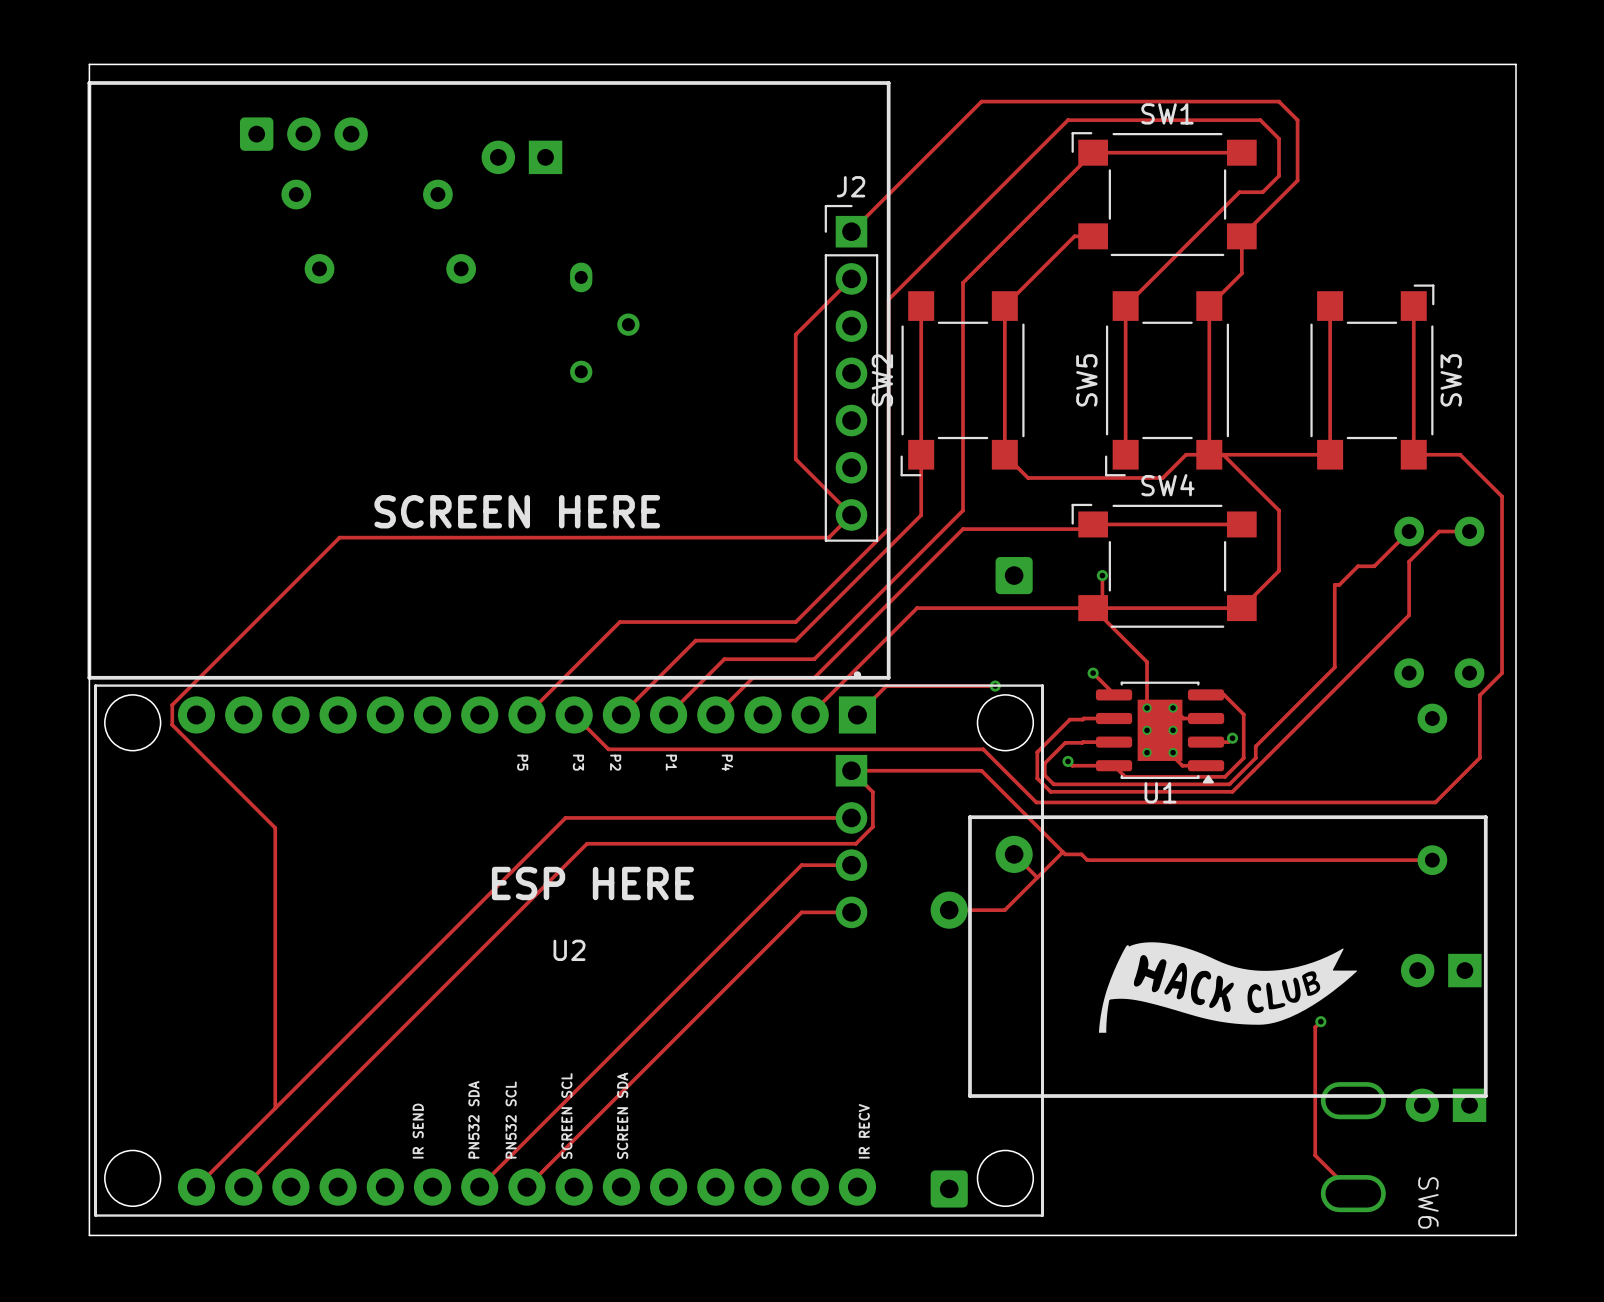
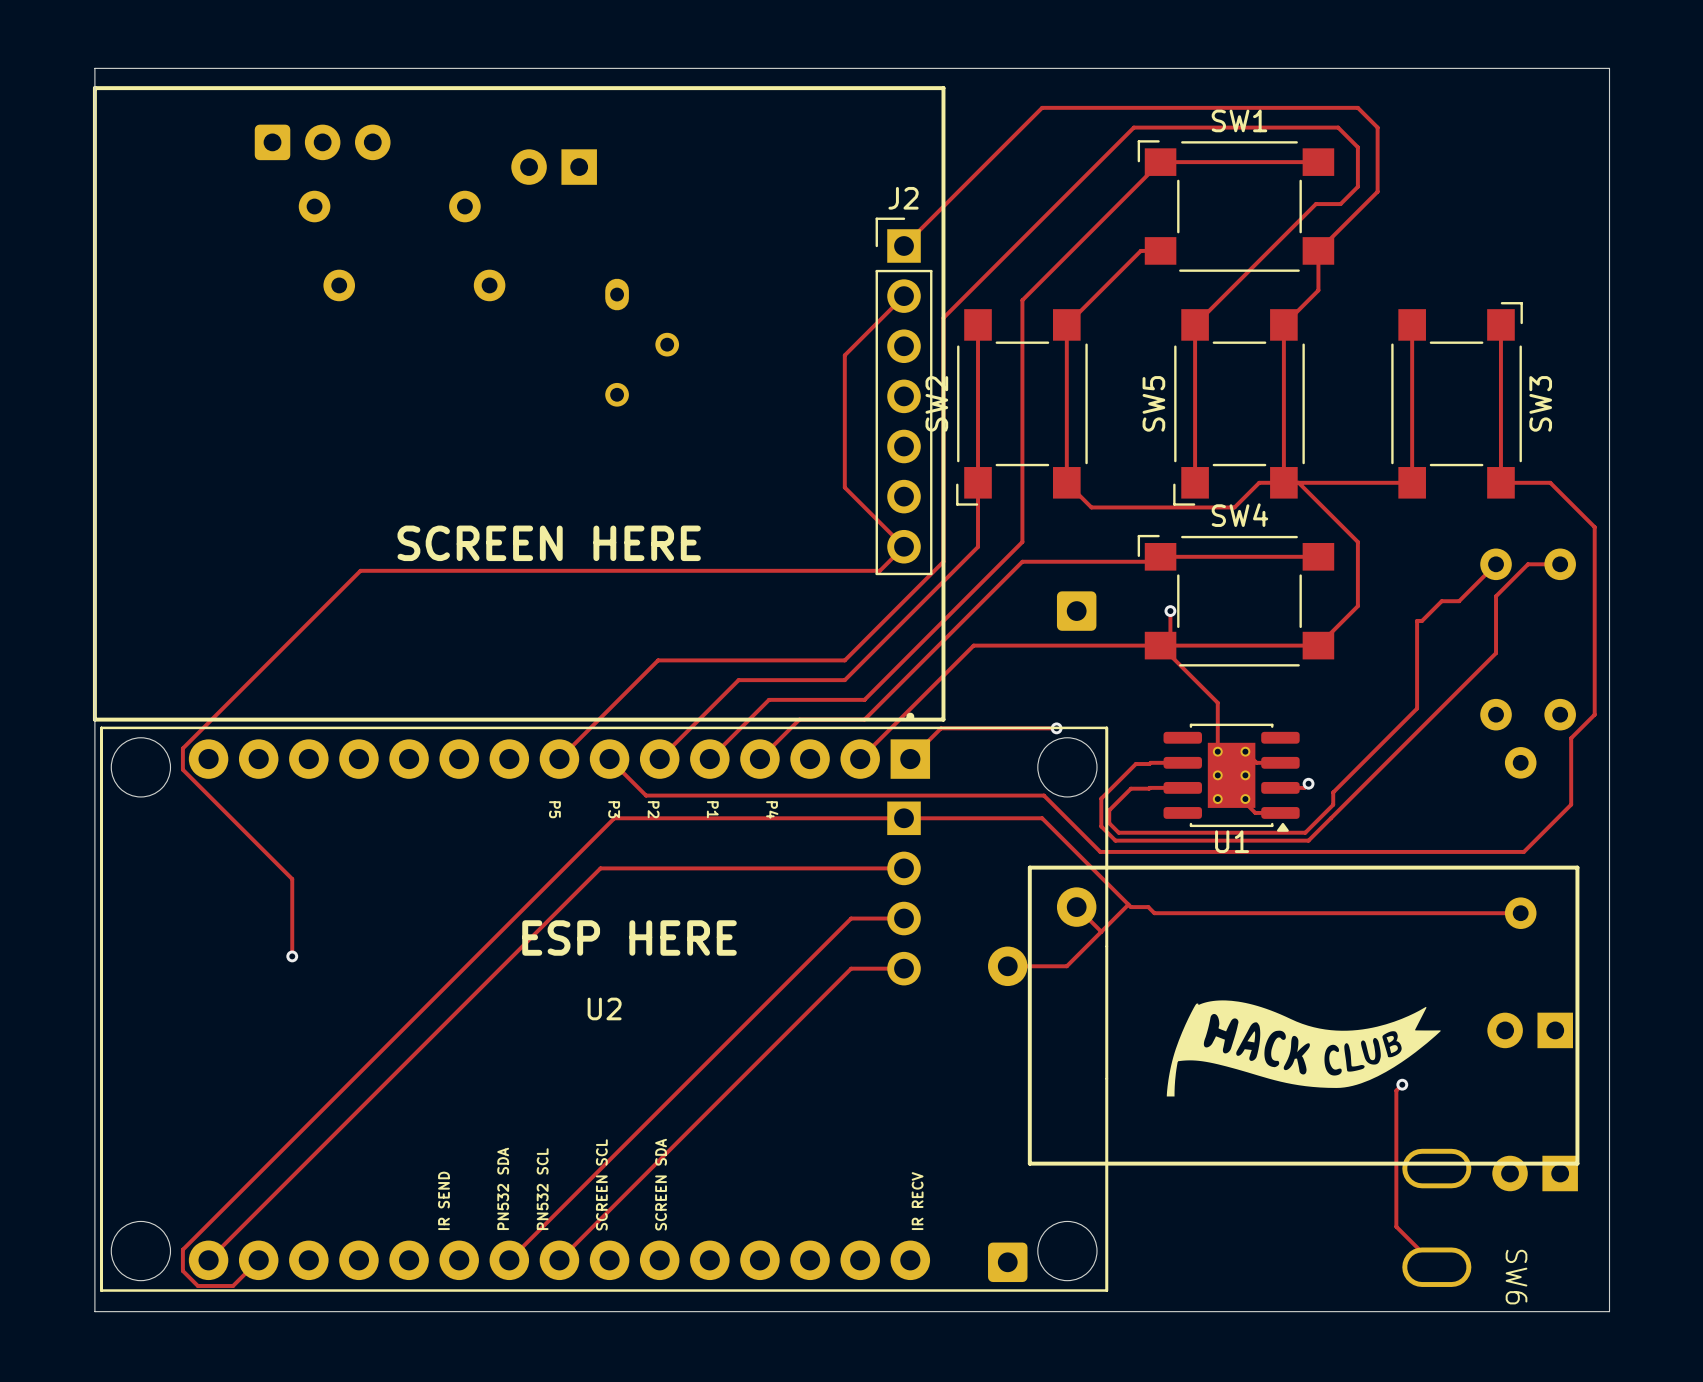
track: (1093, 673) (1114, 694) -> none
via: (1093, 673) -> none
track: (1206, 694) (1224, 694) (1243, 714) (1243, 758) (1224, 776) (1125, 776) (1114, 765) (1072, 765) (1068, 761) -> none
via: (1068, 761) -> none
track: (851, 770) (872, 792) (872, 826) (855, 843) (587, 843) (243, 1187) -> (904, 818) (614, 818) (182, 1249) (182, 1270) (197, 1286) (233, 1286) (258, 1260)
track: (275, 900) (275, 1108) -> none
via: none -> (292, 956)

